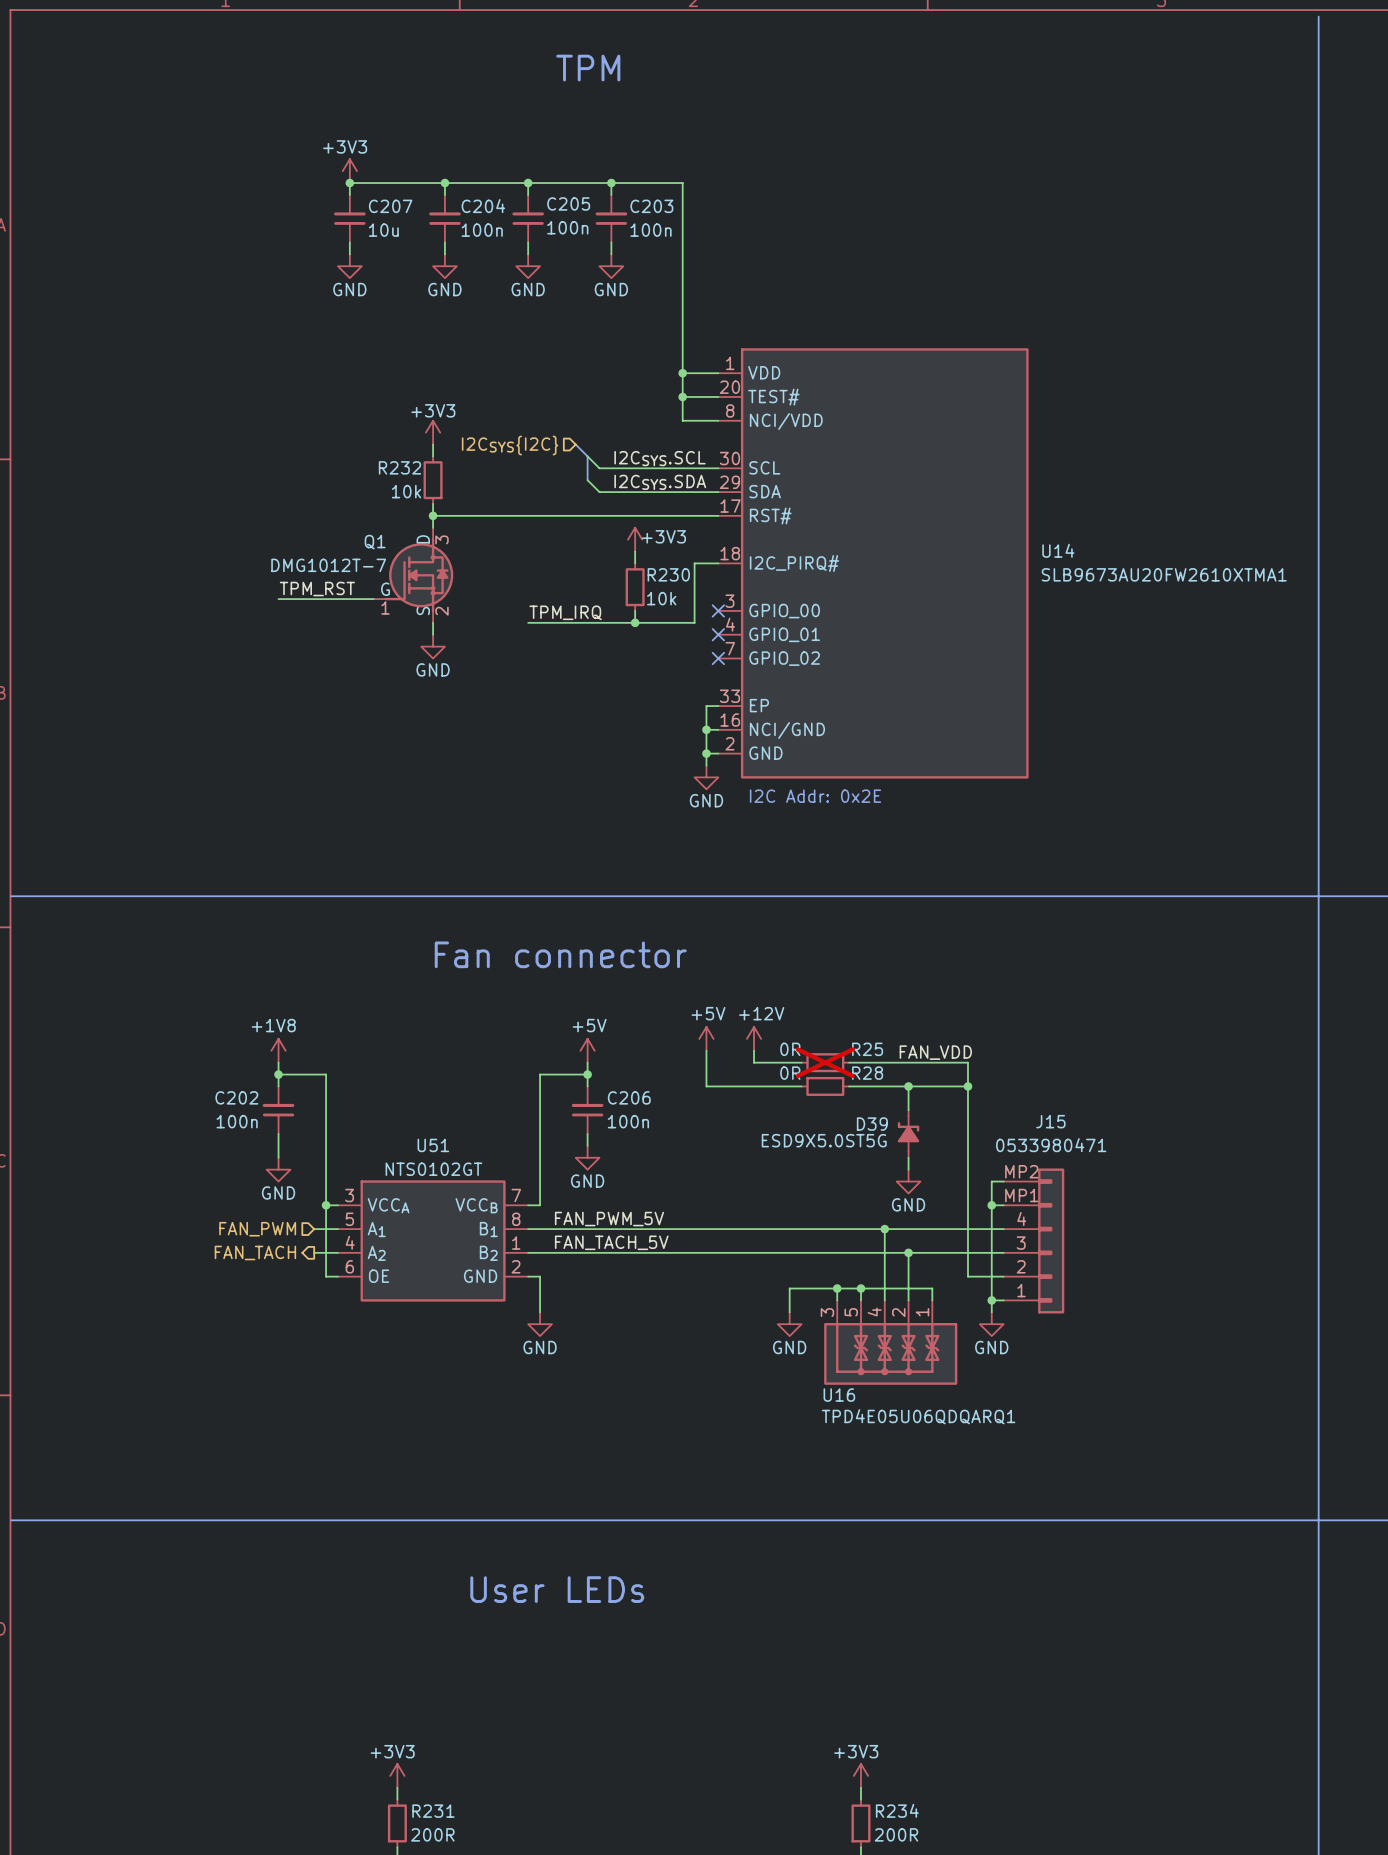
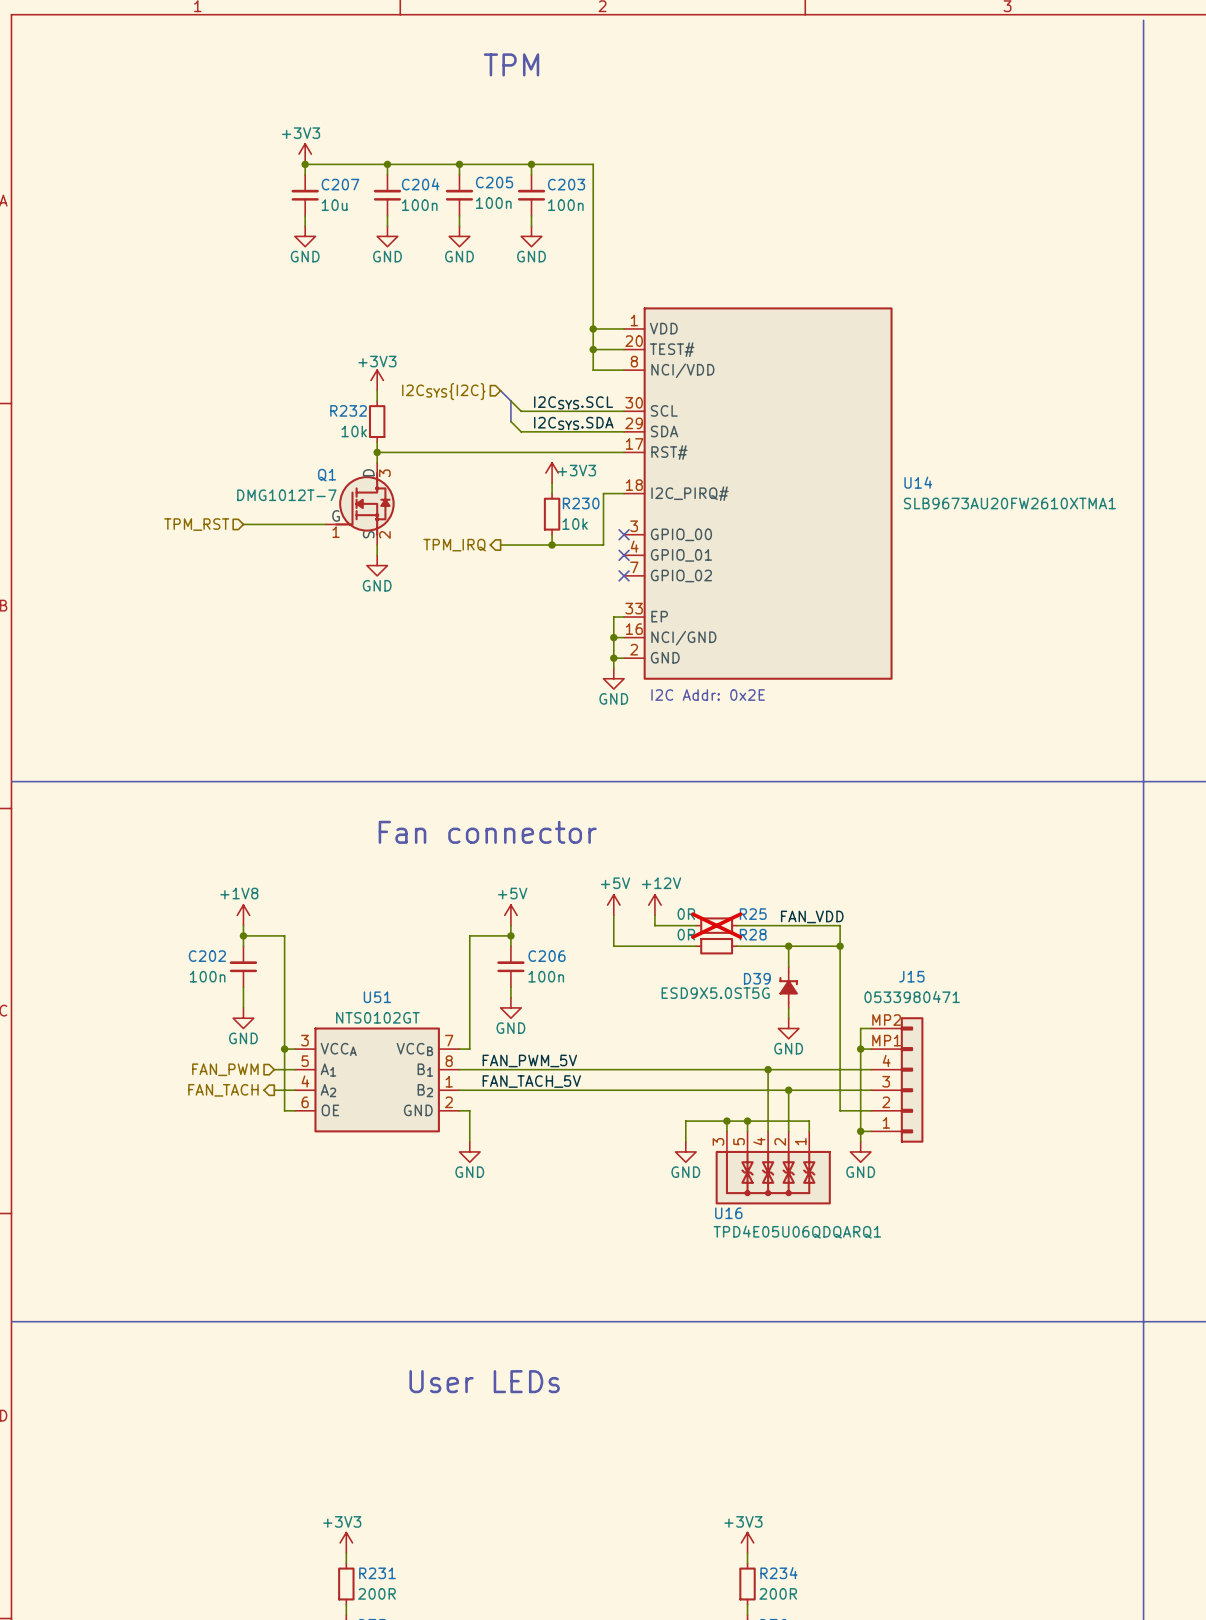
label: TPM_RST (317, 589) -> none
hierarchical label: none -> TPM_RST (196, 524)
label: TPM_IRQ (565, 612) -> none
hierarchical label: none -> TPM_IRQ (454, 545)
wire: (528, 622) (575, 622) -> none

